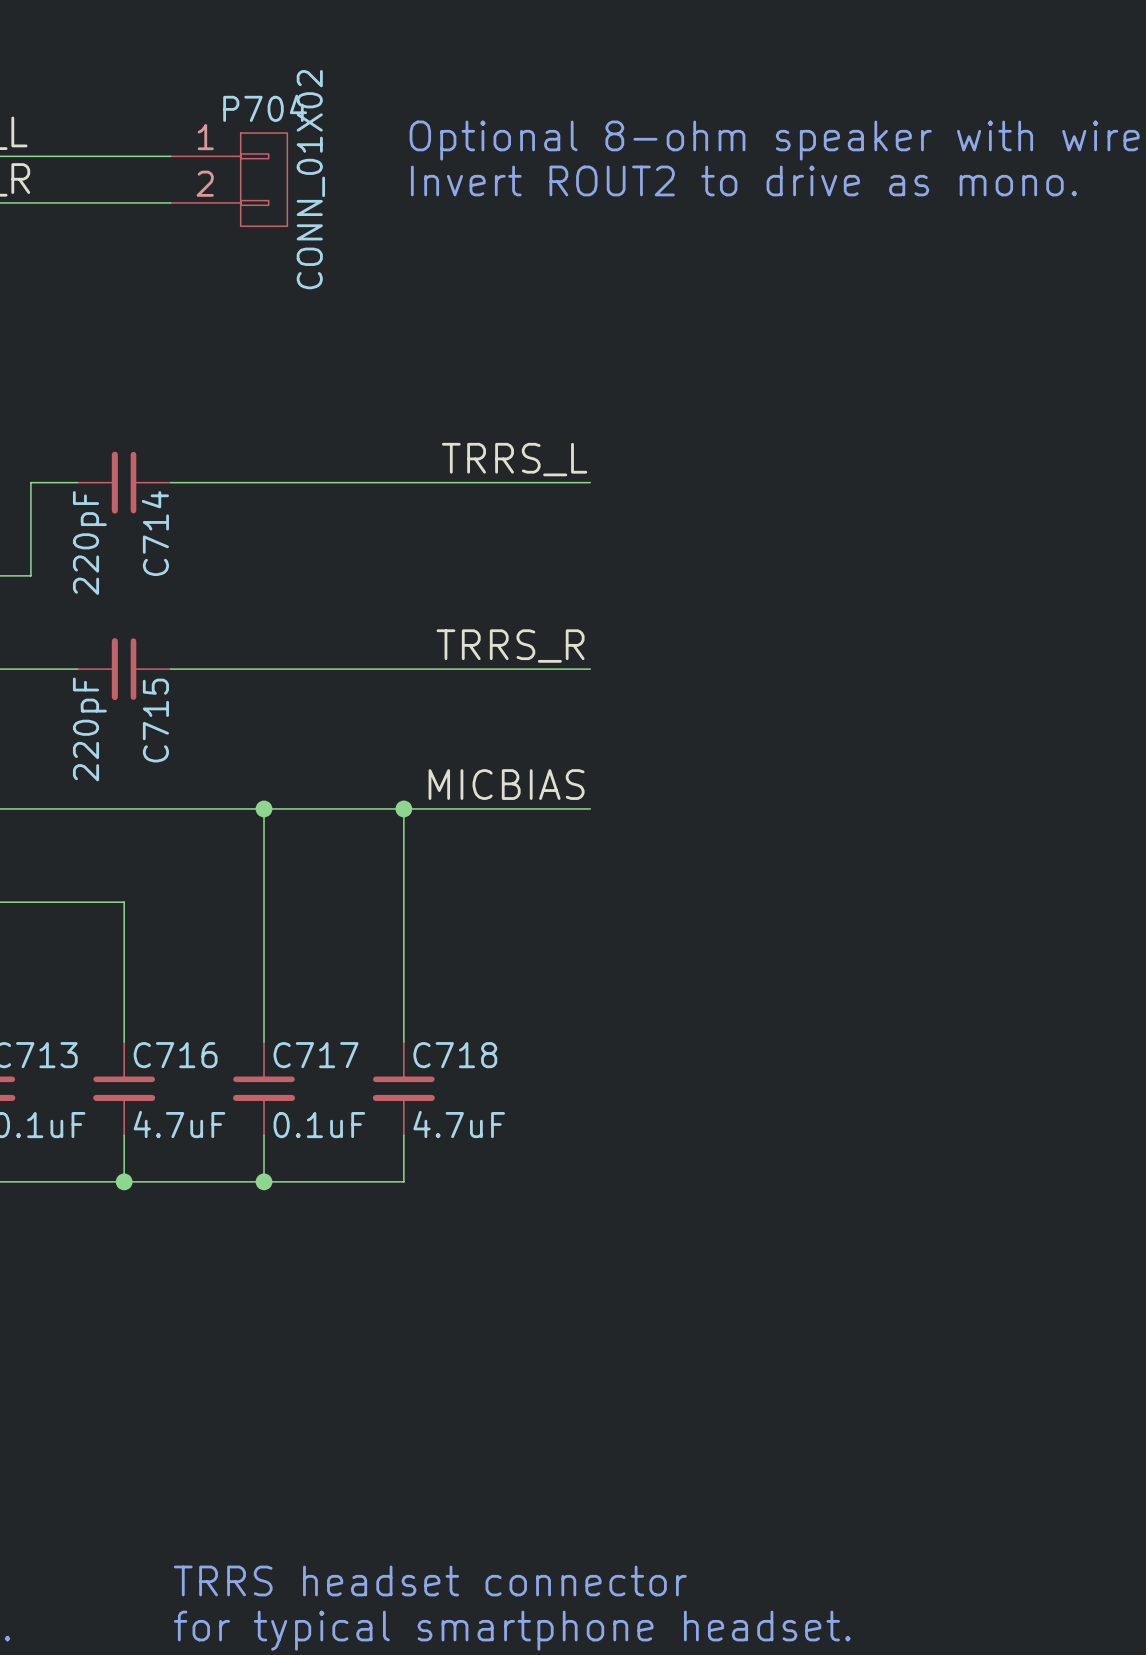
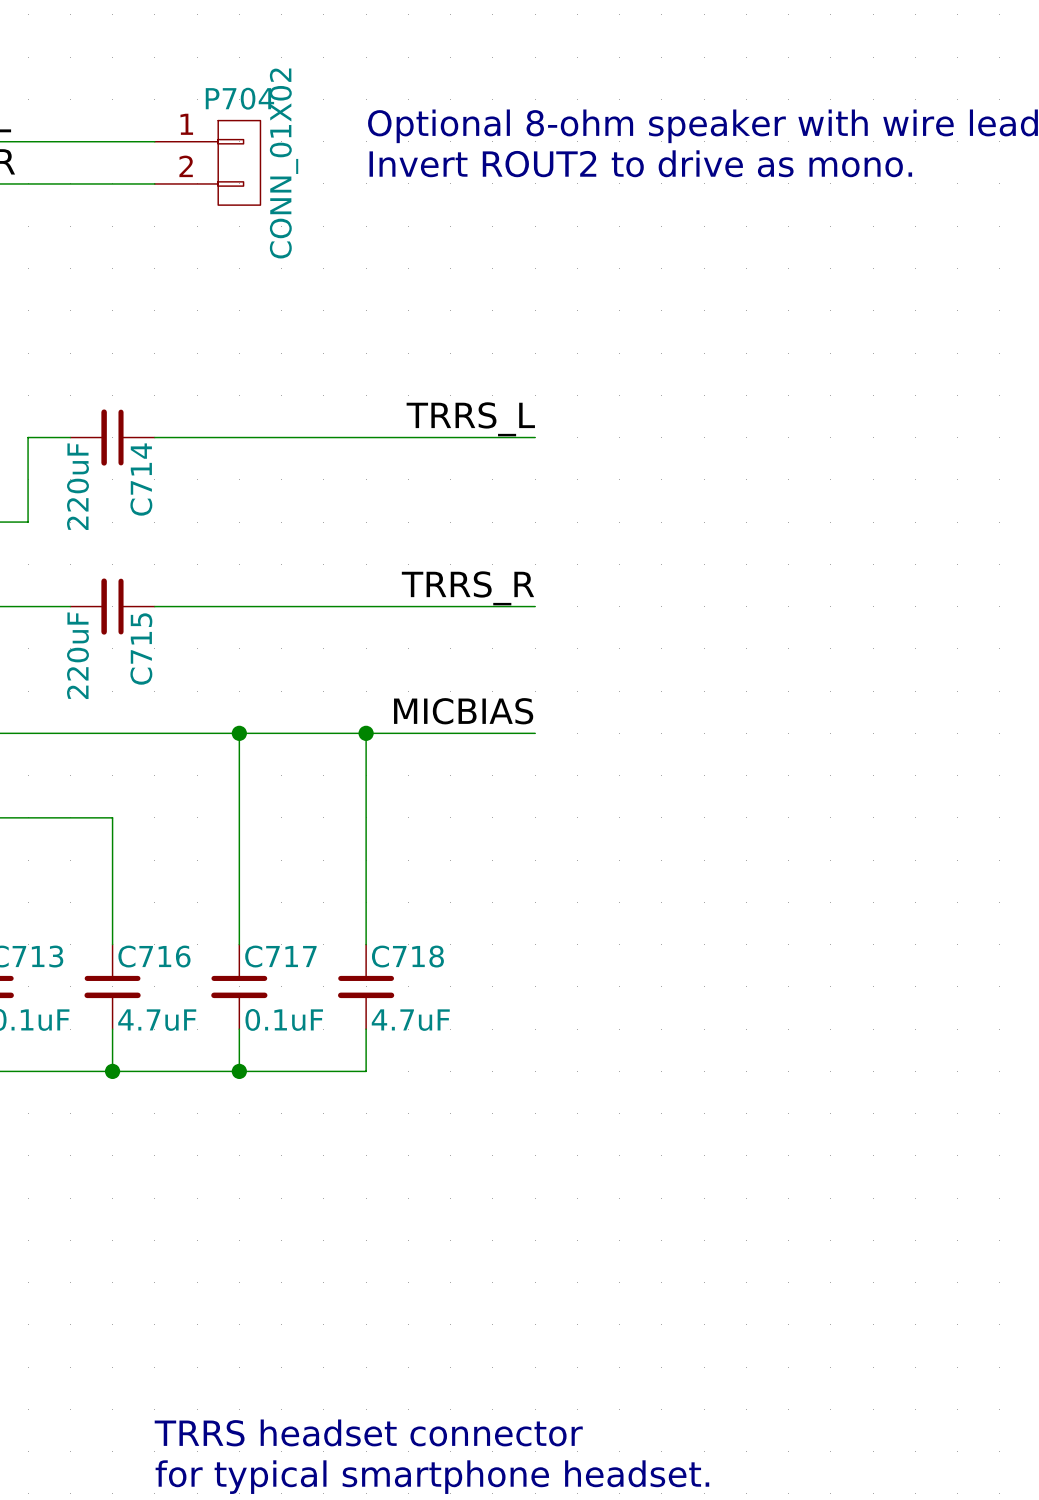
C714 value: 220pF (89, 542) -> 220uF (77, 486)
C715 value: 220pF (89, 729) -> 220uF (77, 655)

